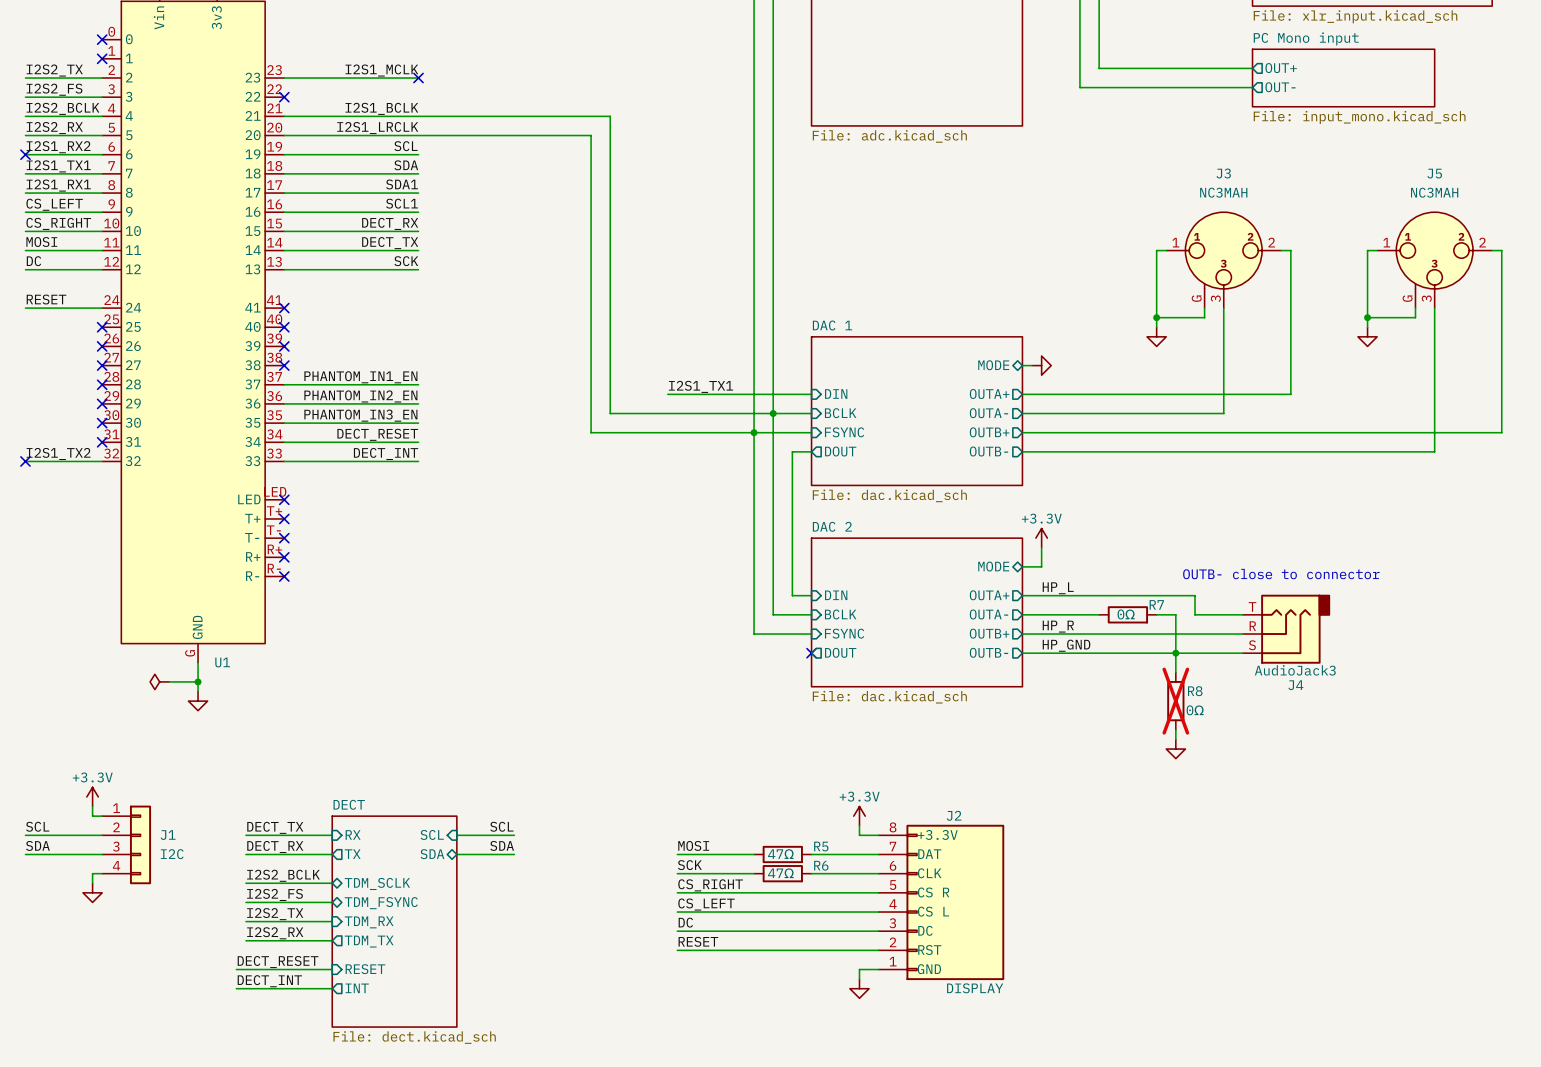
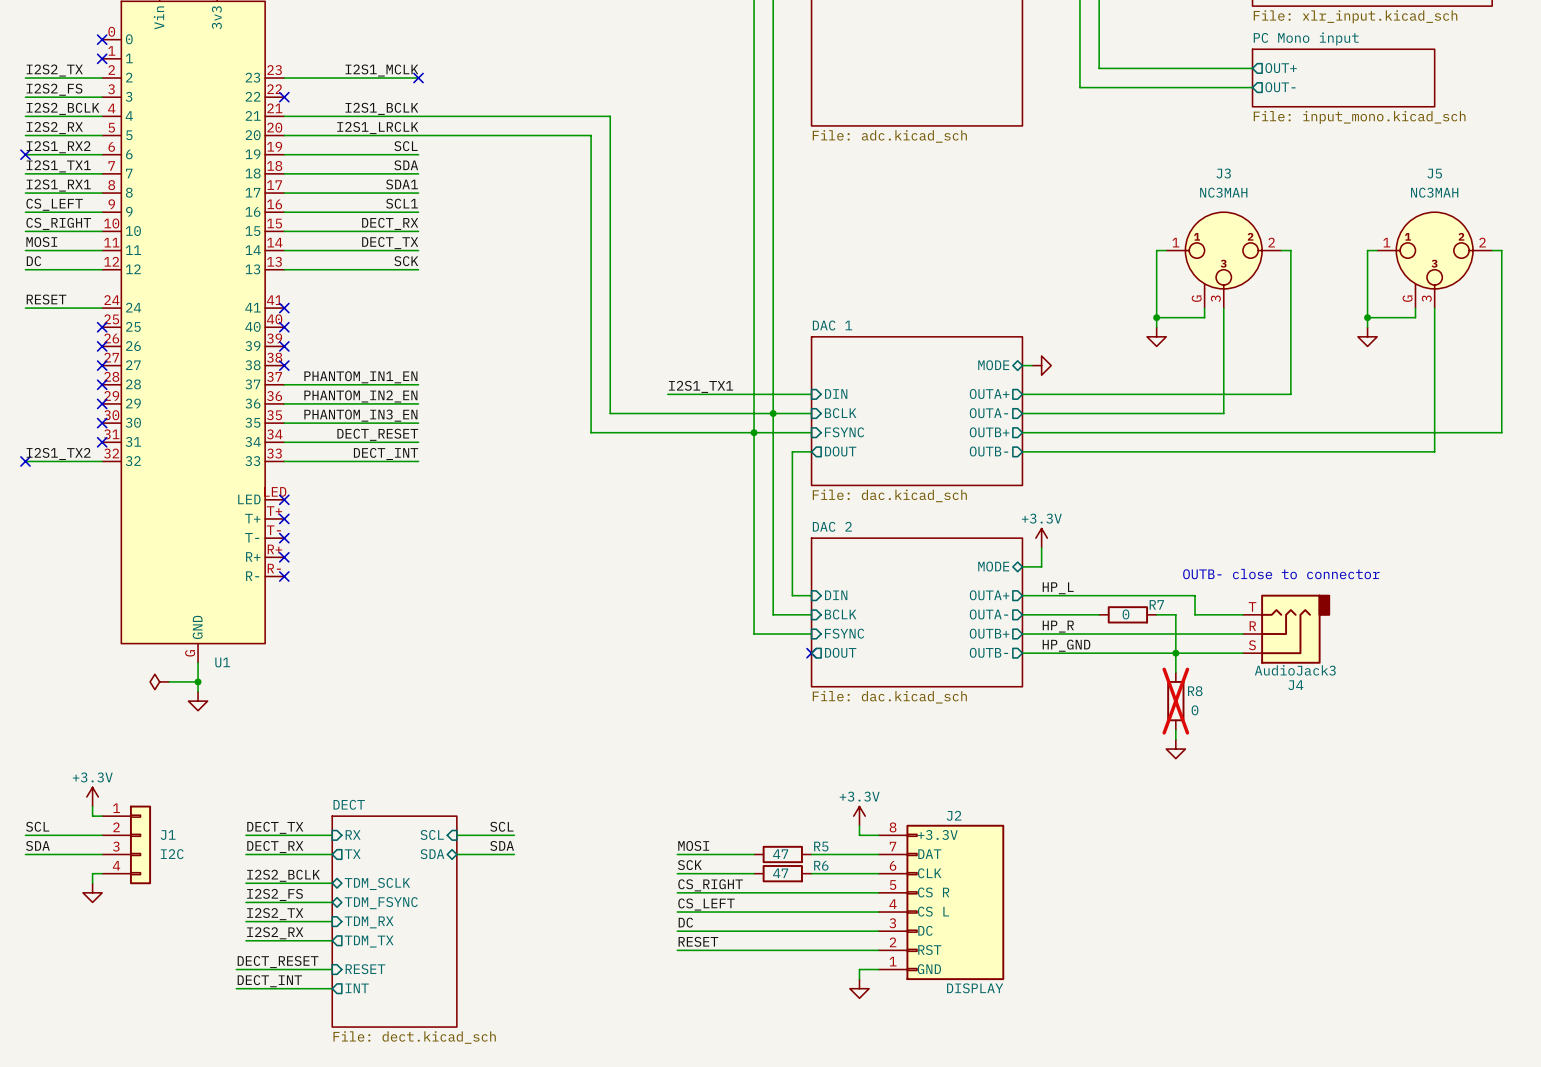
R7 value: 0Ω (1126, 614) -> 0 (1125, 614)
R8 value: 0Ω (1195, 710) -> 0 (1195, 710)
R5 value: 47Ω (780, 854) -> 47 (780, 854)
R6 value: 47Ω (780, 873) -> 47 (780, 873)

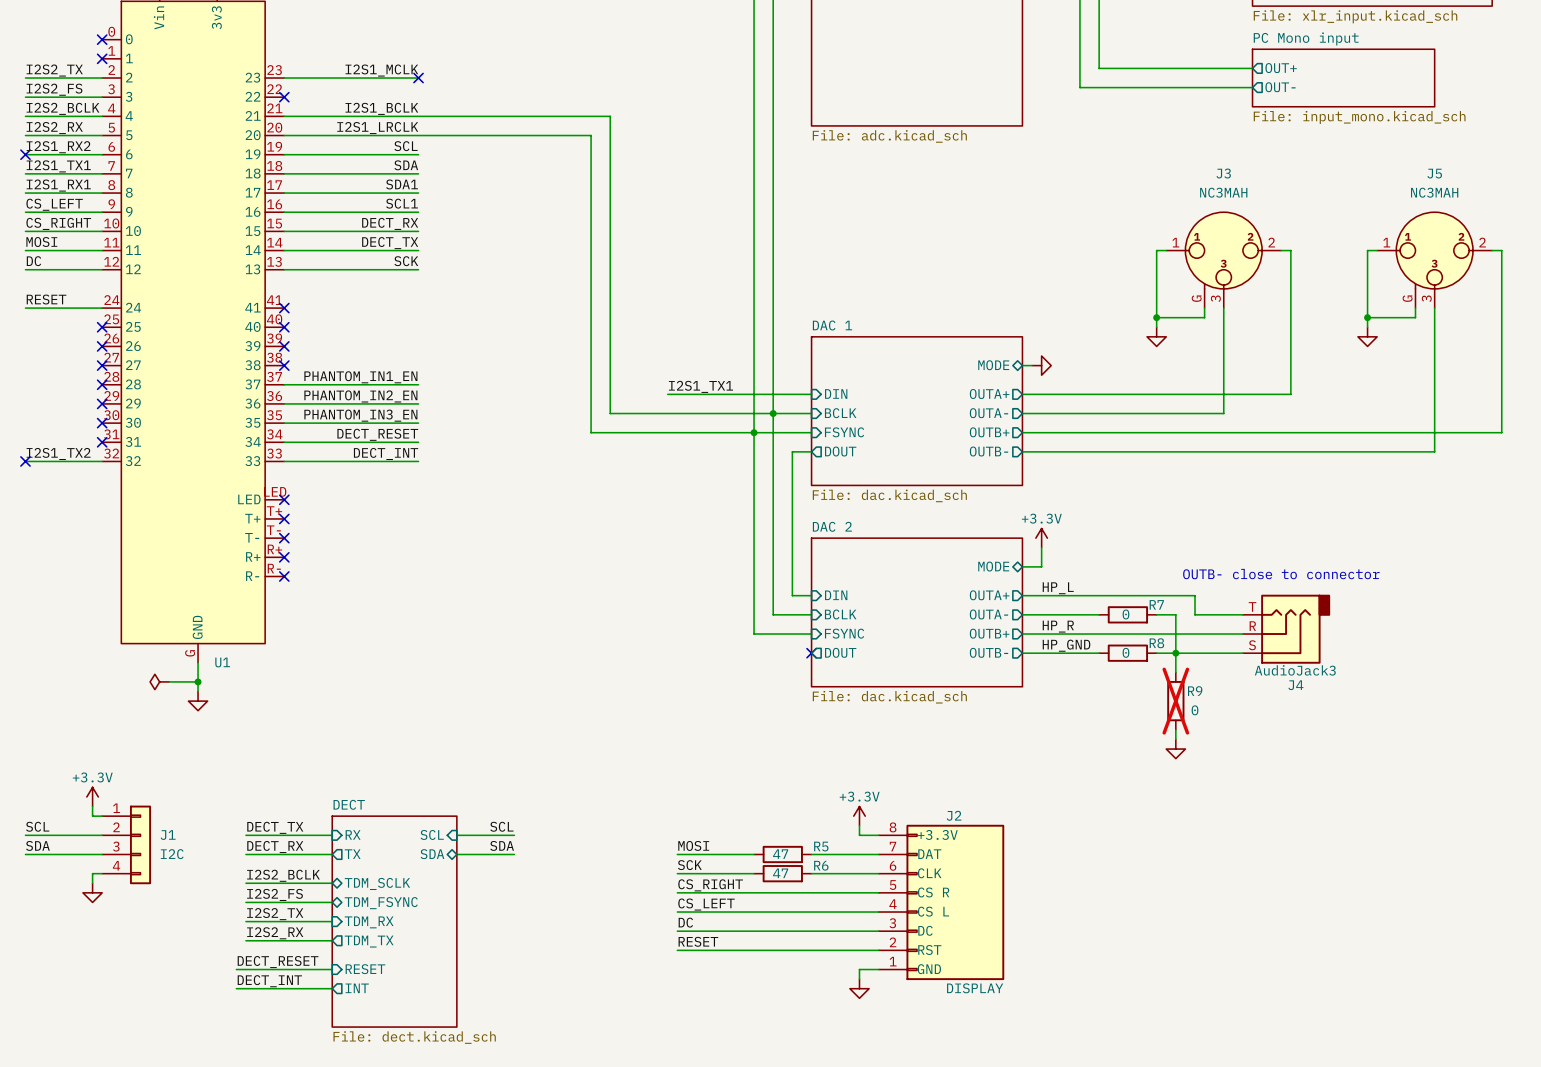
wire: (1099, 653) (1156, 653) -> none
R8: none -> 0 (1127, 653)
R8 name: R8 (1195, 691) -> R9 (1195, 691)

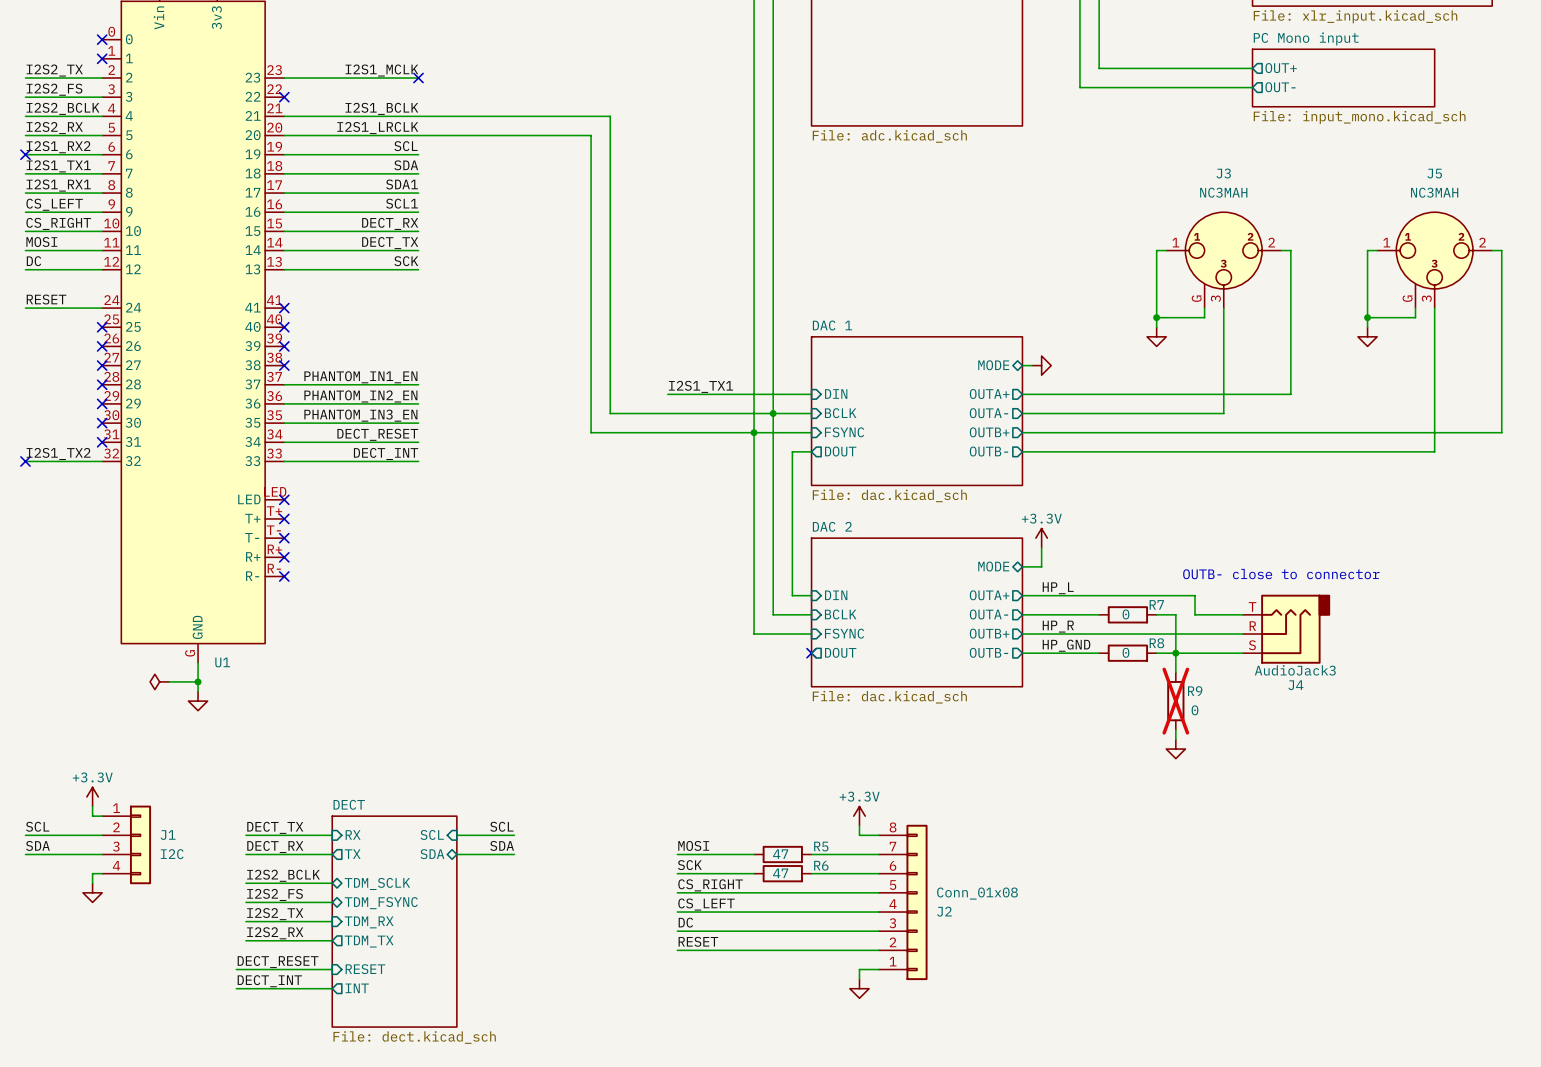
J2 name position: J2 (954, 815) -> J2 (944, 911)
J2 symbol: [878, 824, 1005, 981] -> [878, 824, 928, 981]
J2 text: +3.3V (937, 834) -> none
J2 text: DAT (929, 854) -> none
J2 text: CLK (929, 873) -> none
J2 text: CS R (933, 892) -> none
J2 value: none -> Conn_01x08 (977, 893)
J2 text: CS L (933, 911) -> none
J2 text: DC (925, 930) -> none
J2 text: RST (929, 950) -> none
J2 text: GND (929, 969) -> none
J2 text: DISPLAY (975, 988) -> none

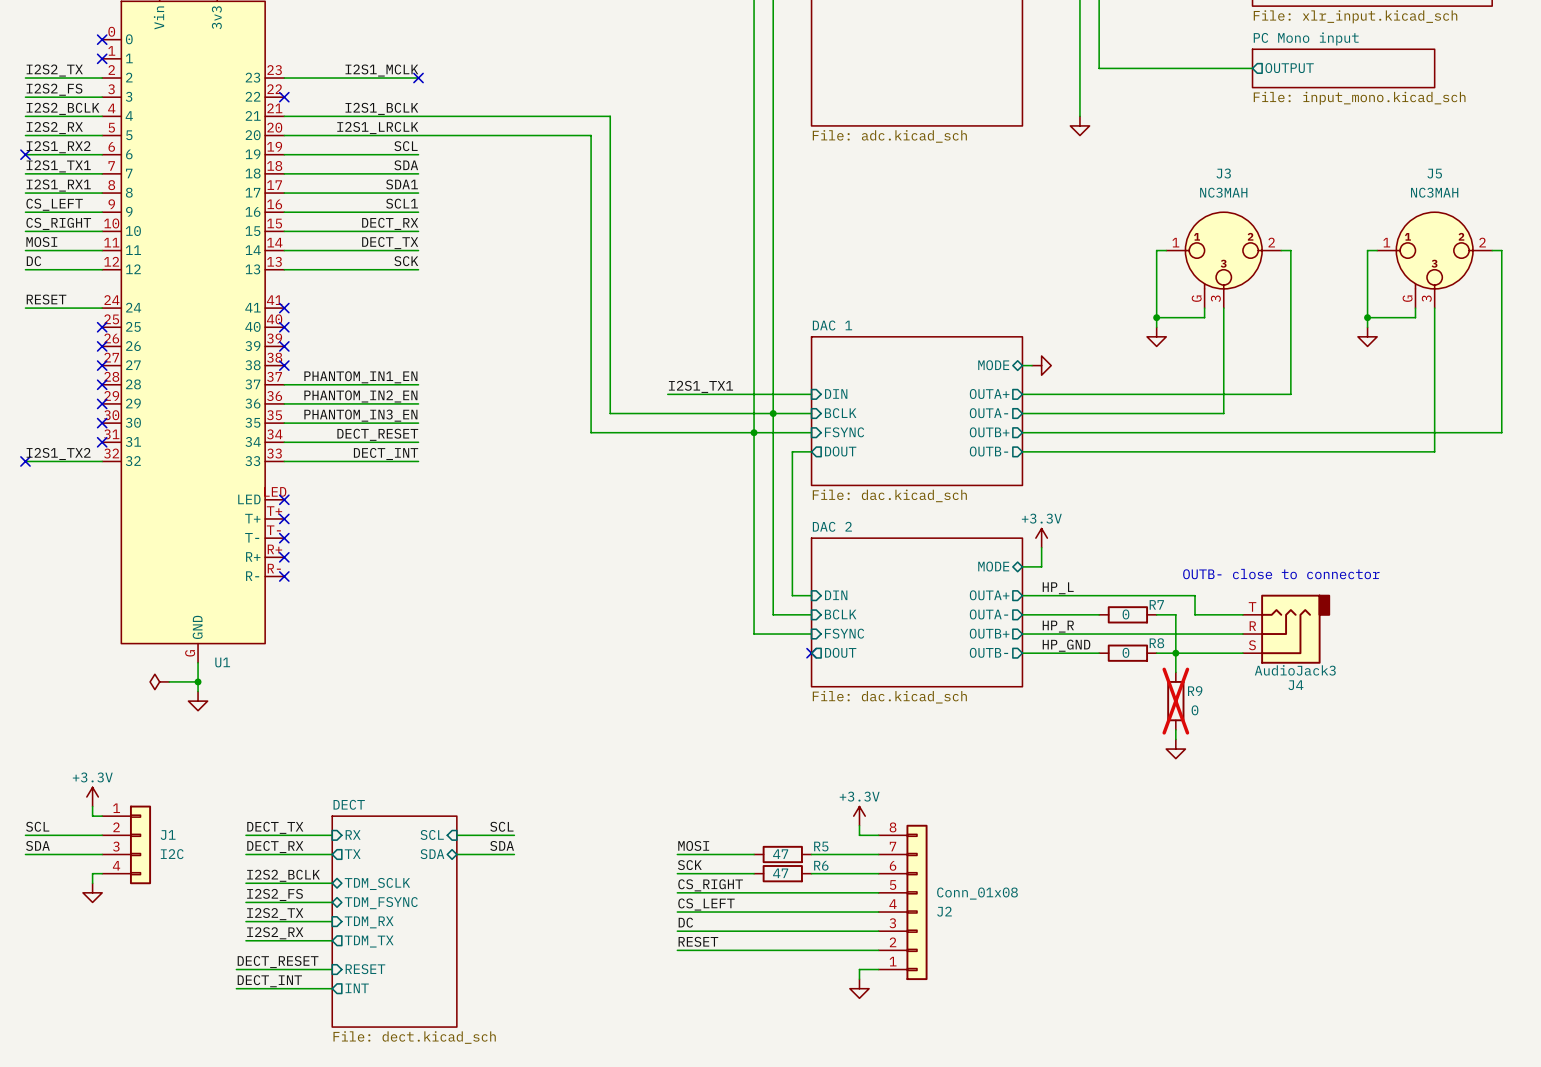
sheet pin: OUT+ (1281, 68) -> OUTPUT (1289, 68)
sheet PC Mono input: none -> File: input_mono.kicad_sch (1343, 68)
sheet PC Mono input: File: input_mono.kicad_sch (1343, 78) -> none
wire: (1079, 87) (1252, 87) -> (1079, 87) (1079, 116)
sheet pin: OUT- (1280, 87) -> none
power symbol: none -> (1079, 125)

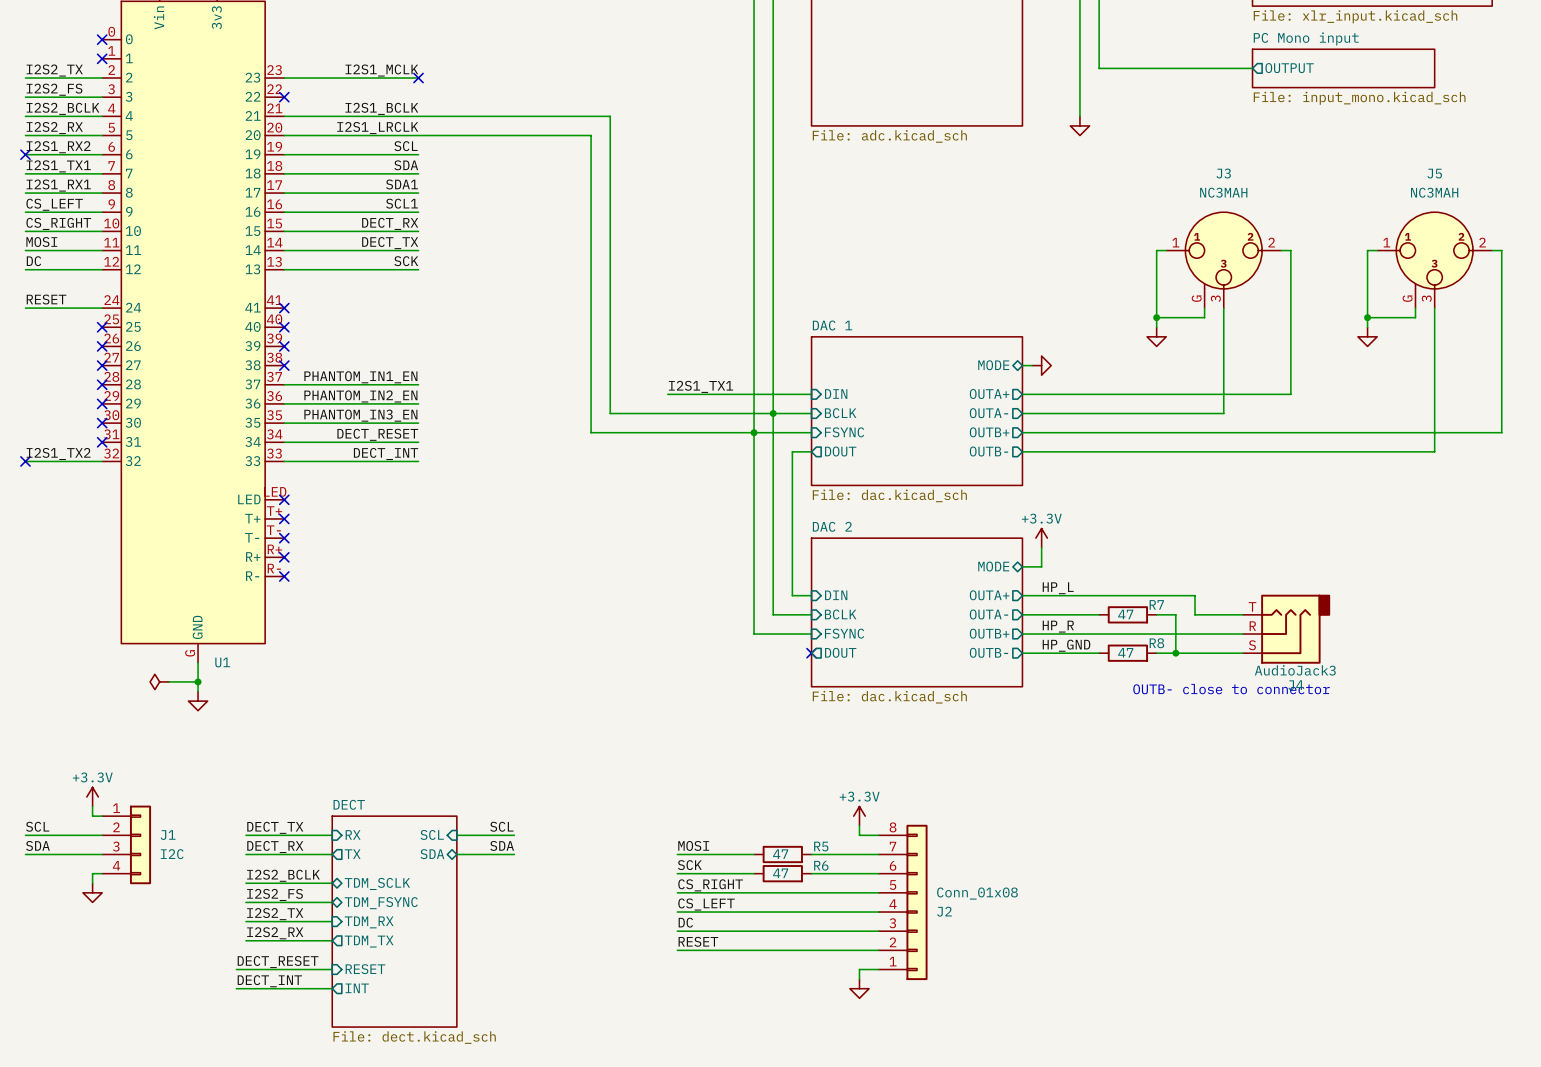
text position: OUTB- close to connector (1281, 574) -> OUTB- close to connector (1231, 689)
R7 value: 0 (1125, 614) -> 47 (1125, 614)
R8 value: 0 (1125, 652) -> 47 (1125, 652)
wire: (1175, 653) (1175, 672) -> none
R9: 0 (1175, 701) -> none
wire: (1175, 729) (1175, 739) -> none
power symbol: (1175, 749) -> none

